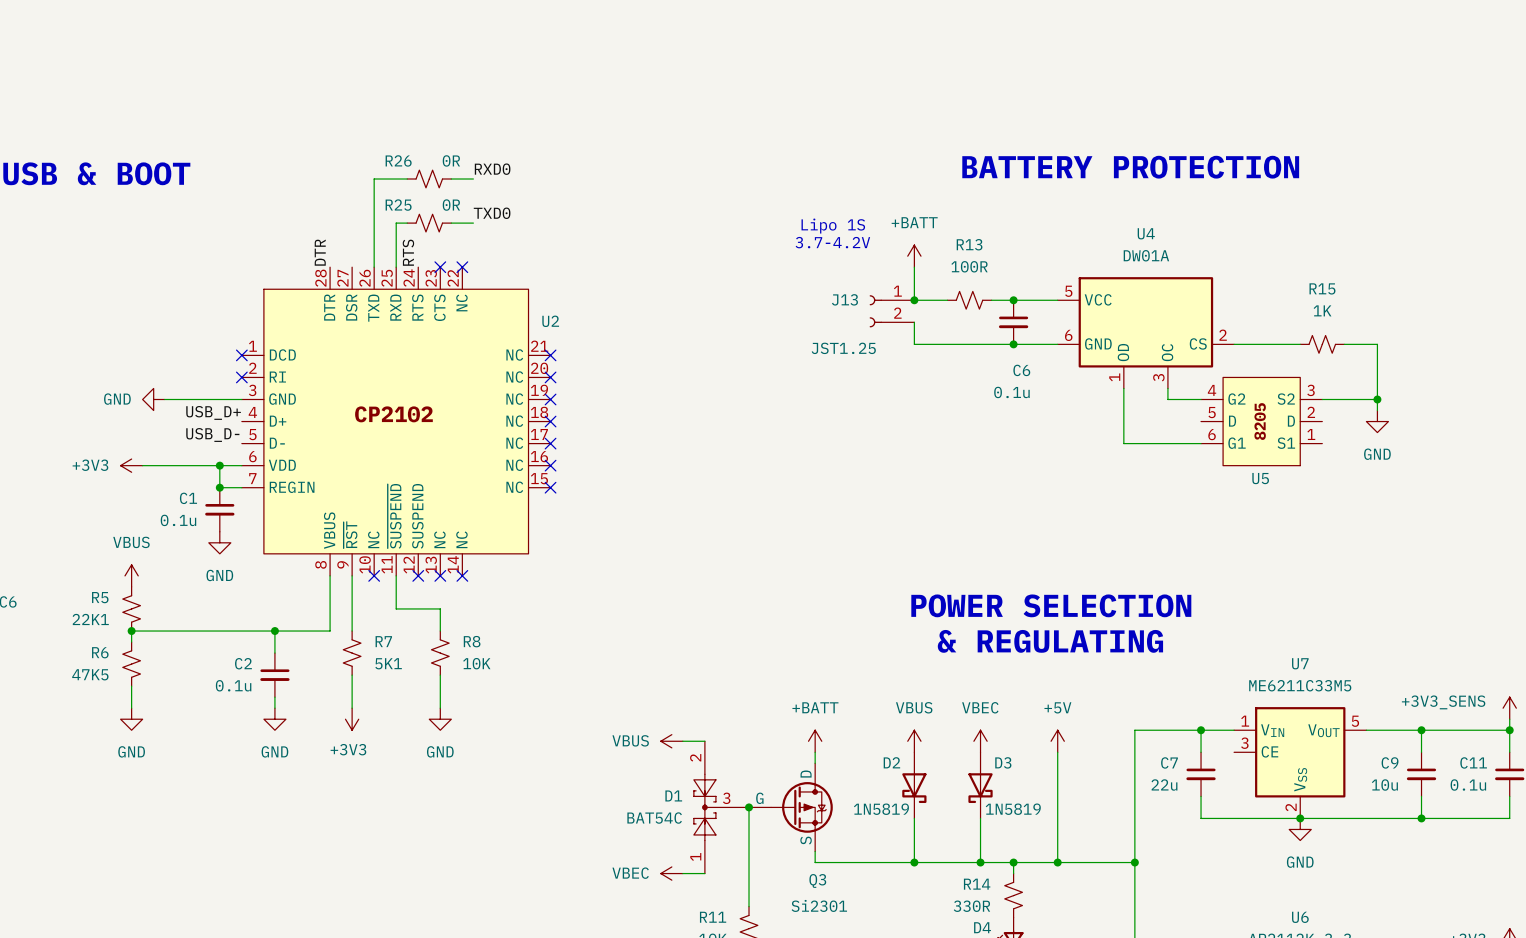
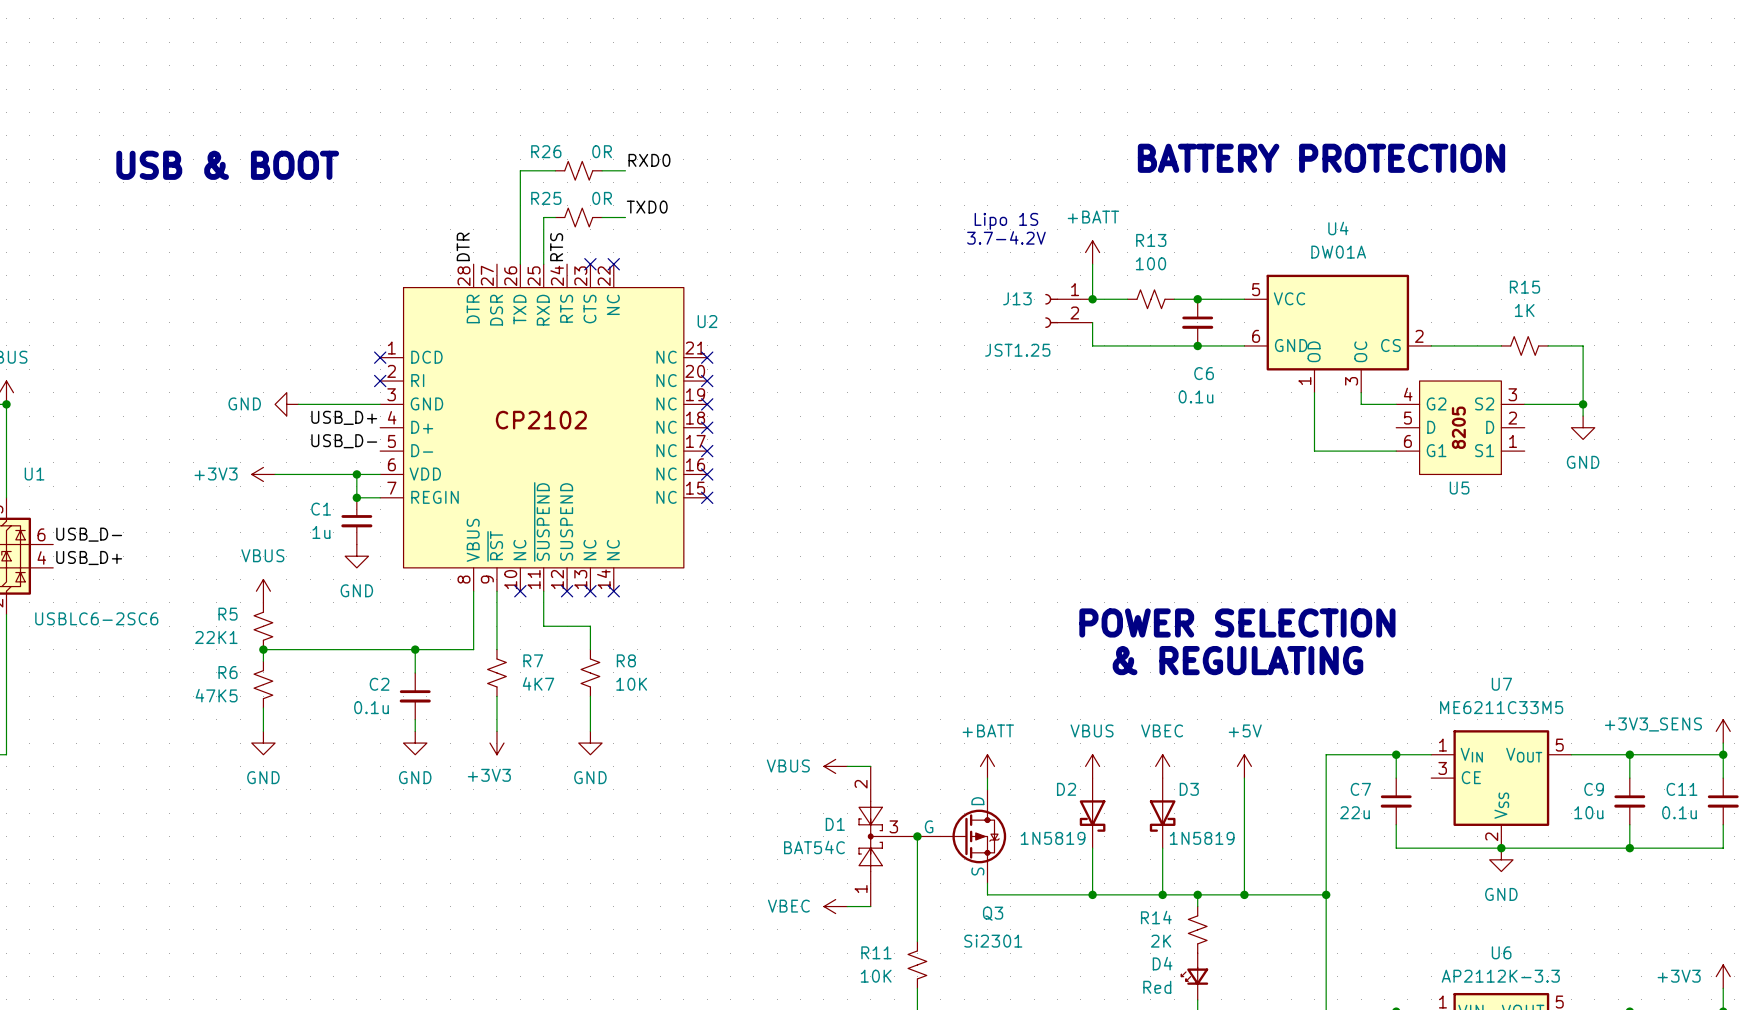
R13 value: 100R (969, 266) -> 100 (1150, 263)
C1 value: 0.1u (178, 520) -> 1u (321, 532)
R7 value: 5K1 (388, 663) -> 4K7 (538, 683)
R14 value: 330R (971, 906) -> 2K (1161, 941)

